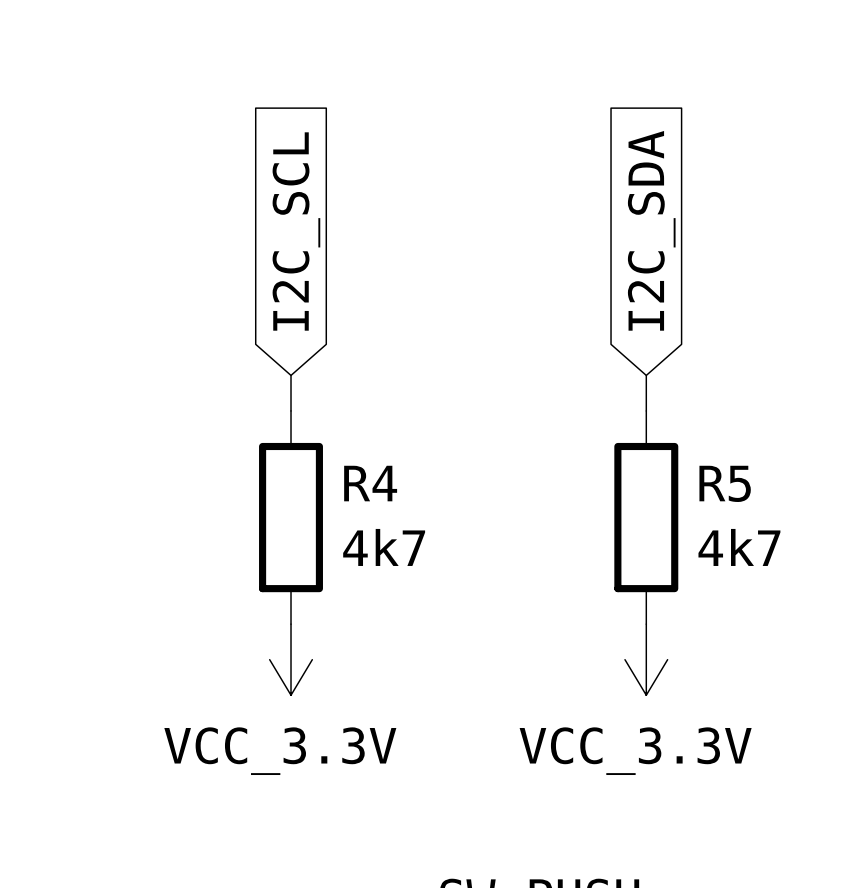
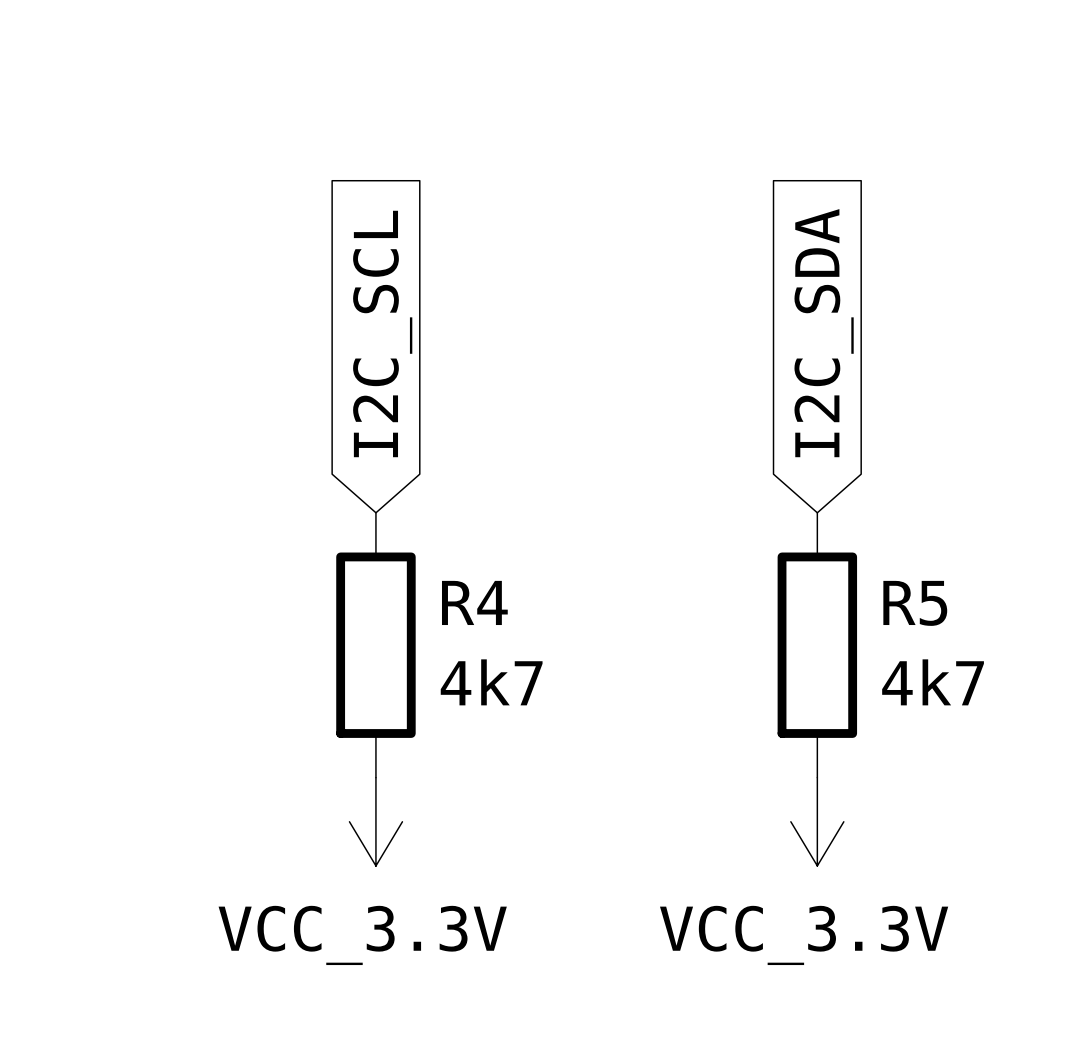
global label position: I2C_SDA (651, 230) -> I2C_SDA (824, 333)
global label position: I2C_SCL (296, 231) -> I2C_SCL (382, 333)
wire: (291, 375) (291, 410) -> none
wire: (646, 375) (646, 410) -> none

